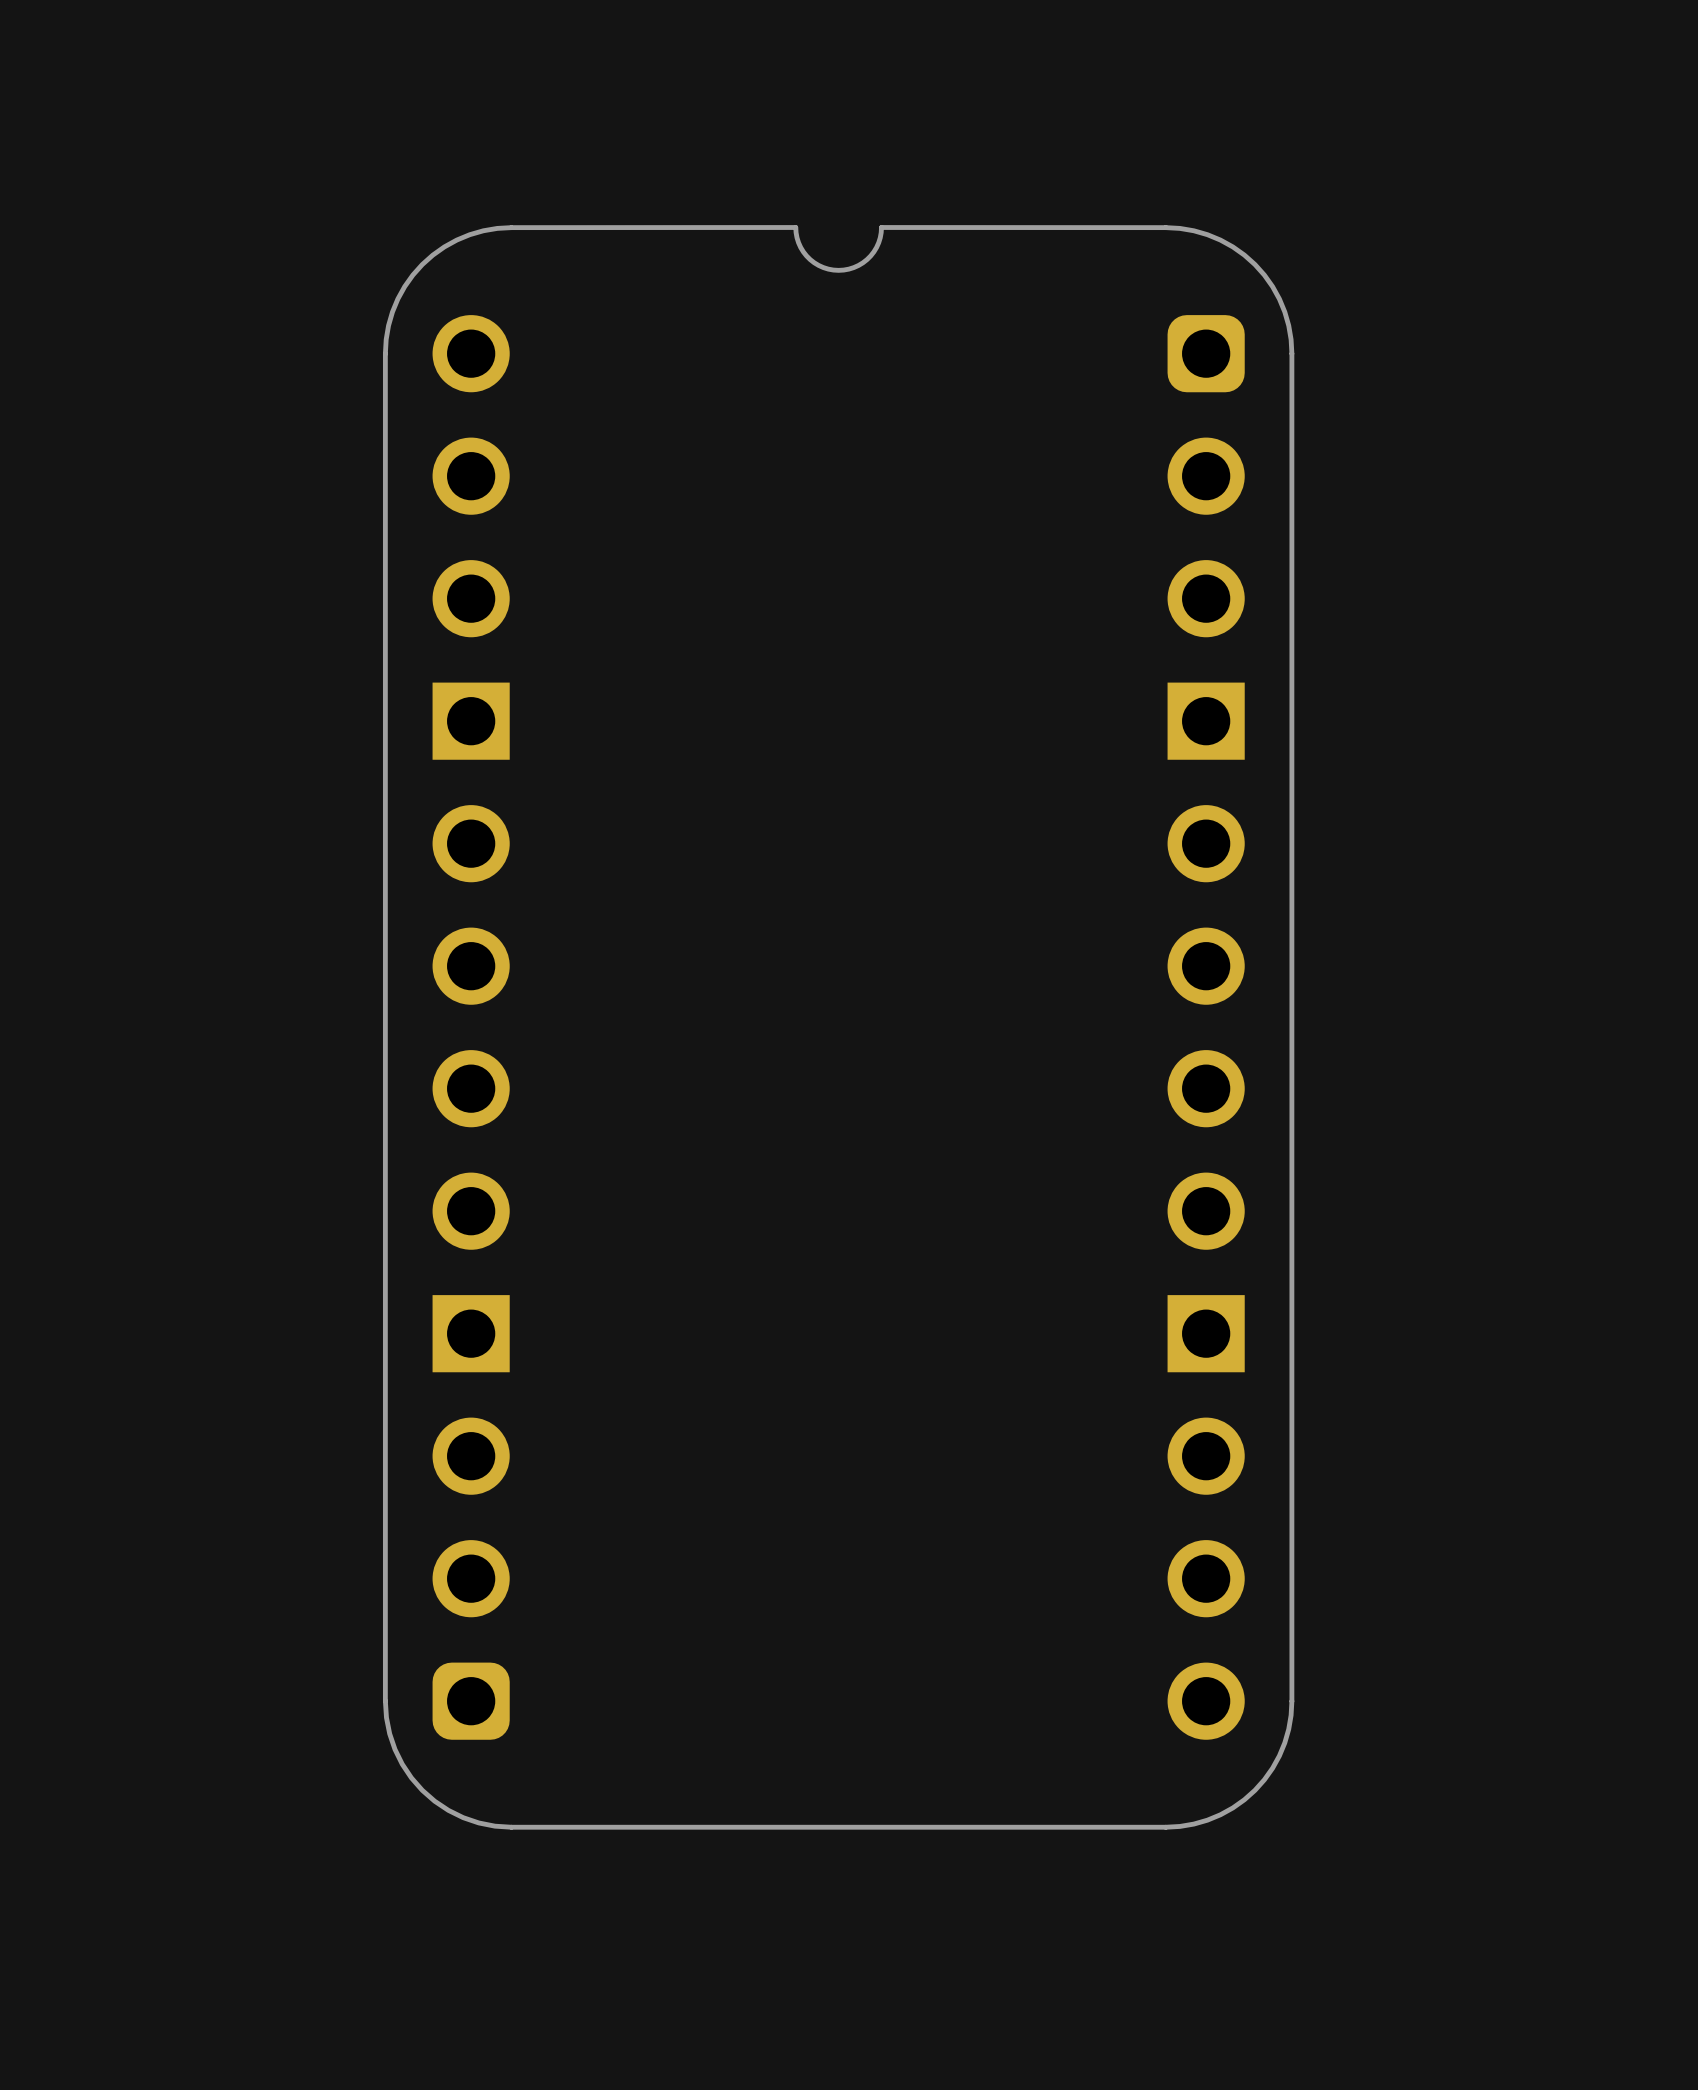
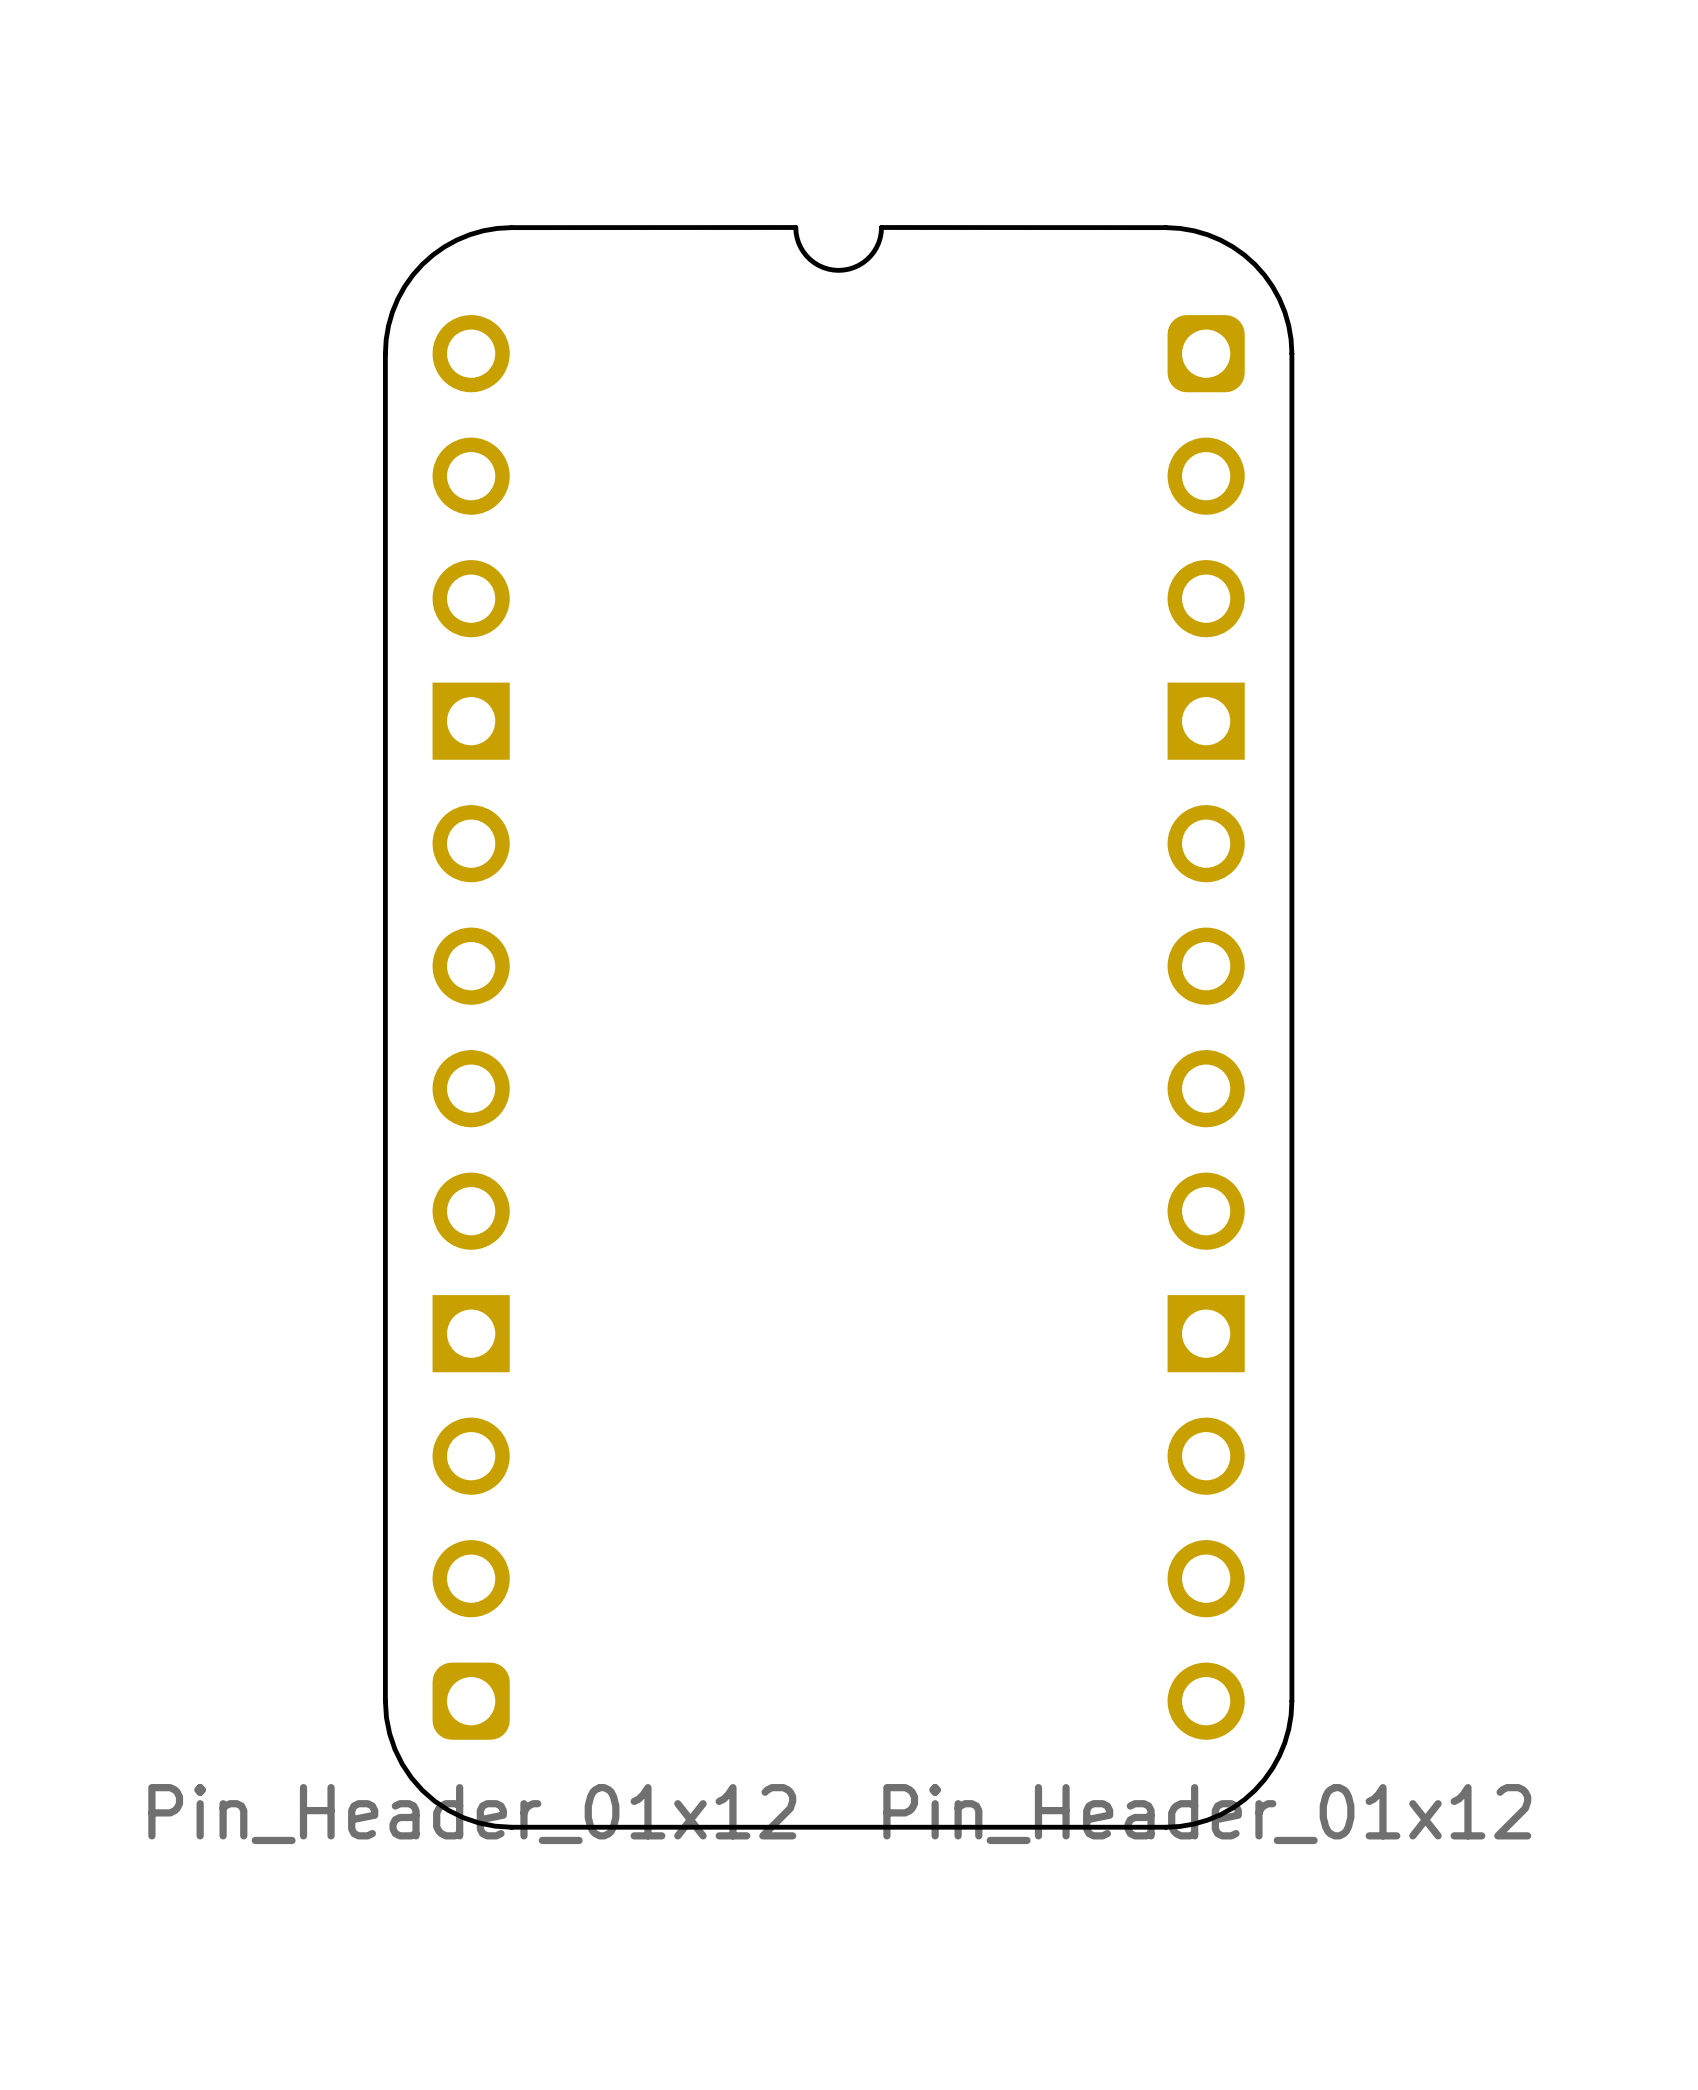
drawing: none -> [148, 1784, 1532, 1845]

